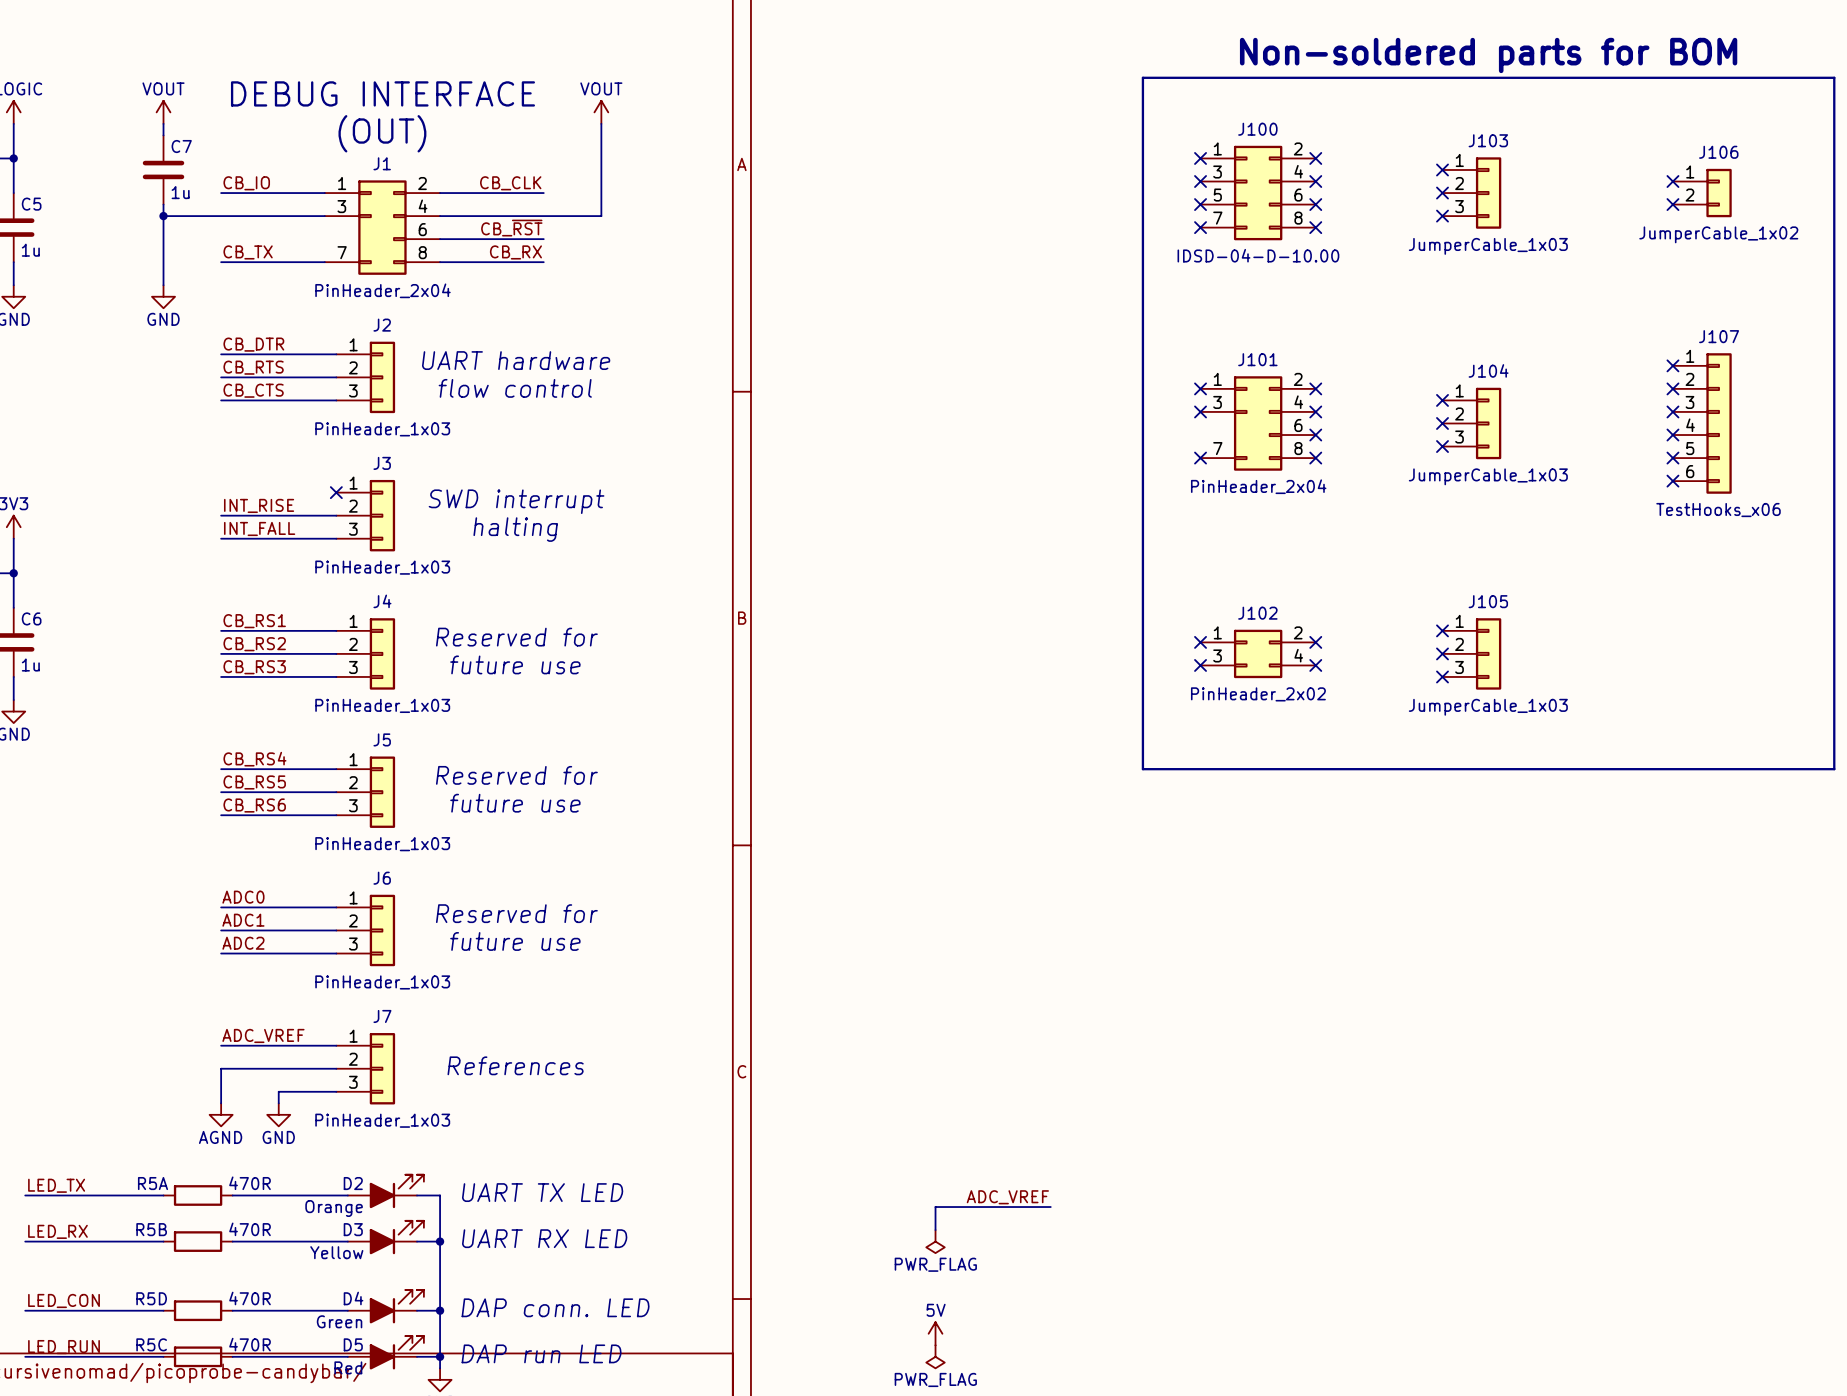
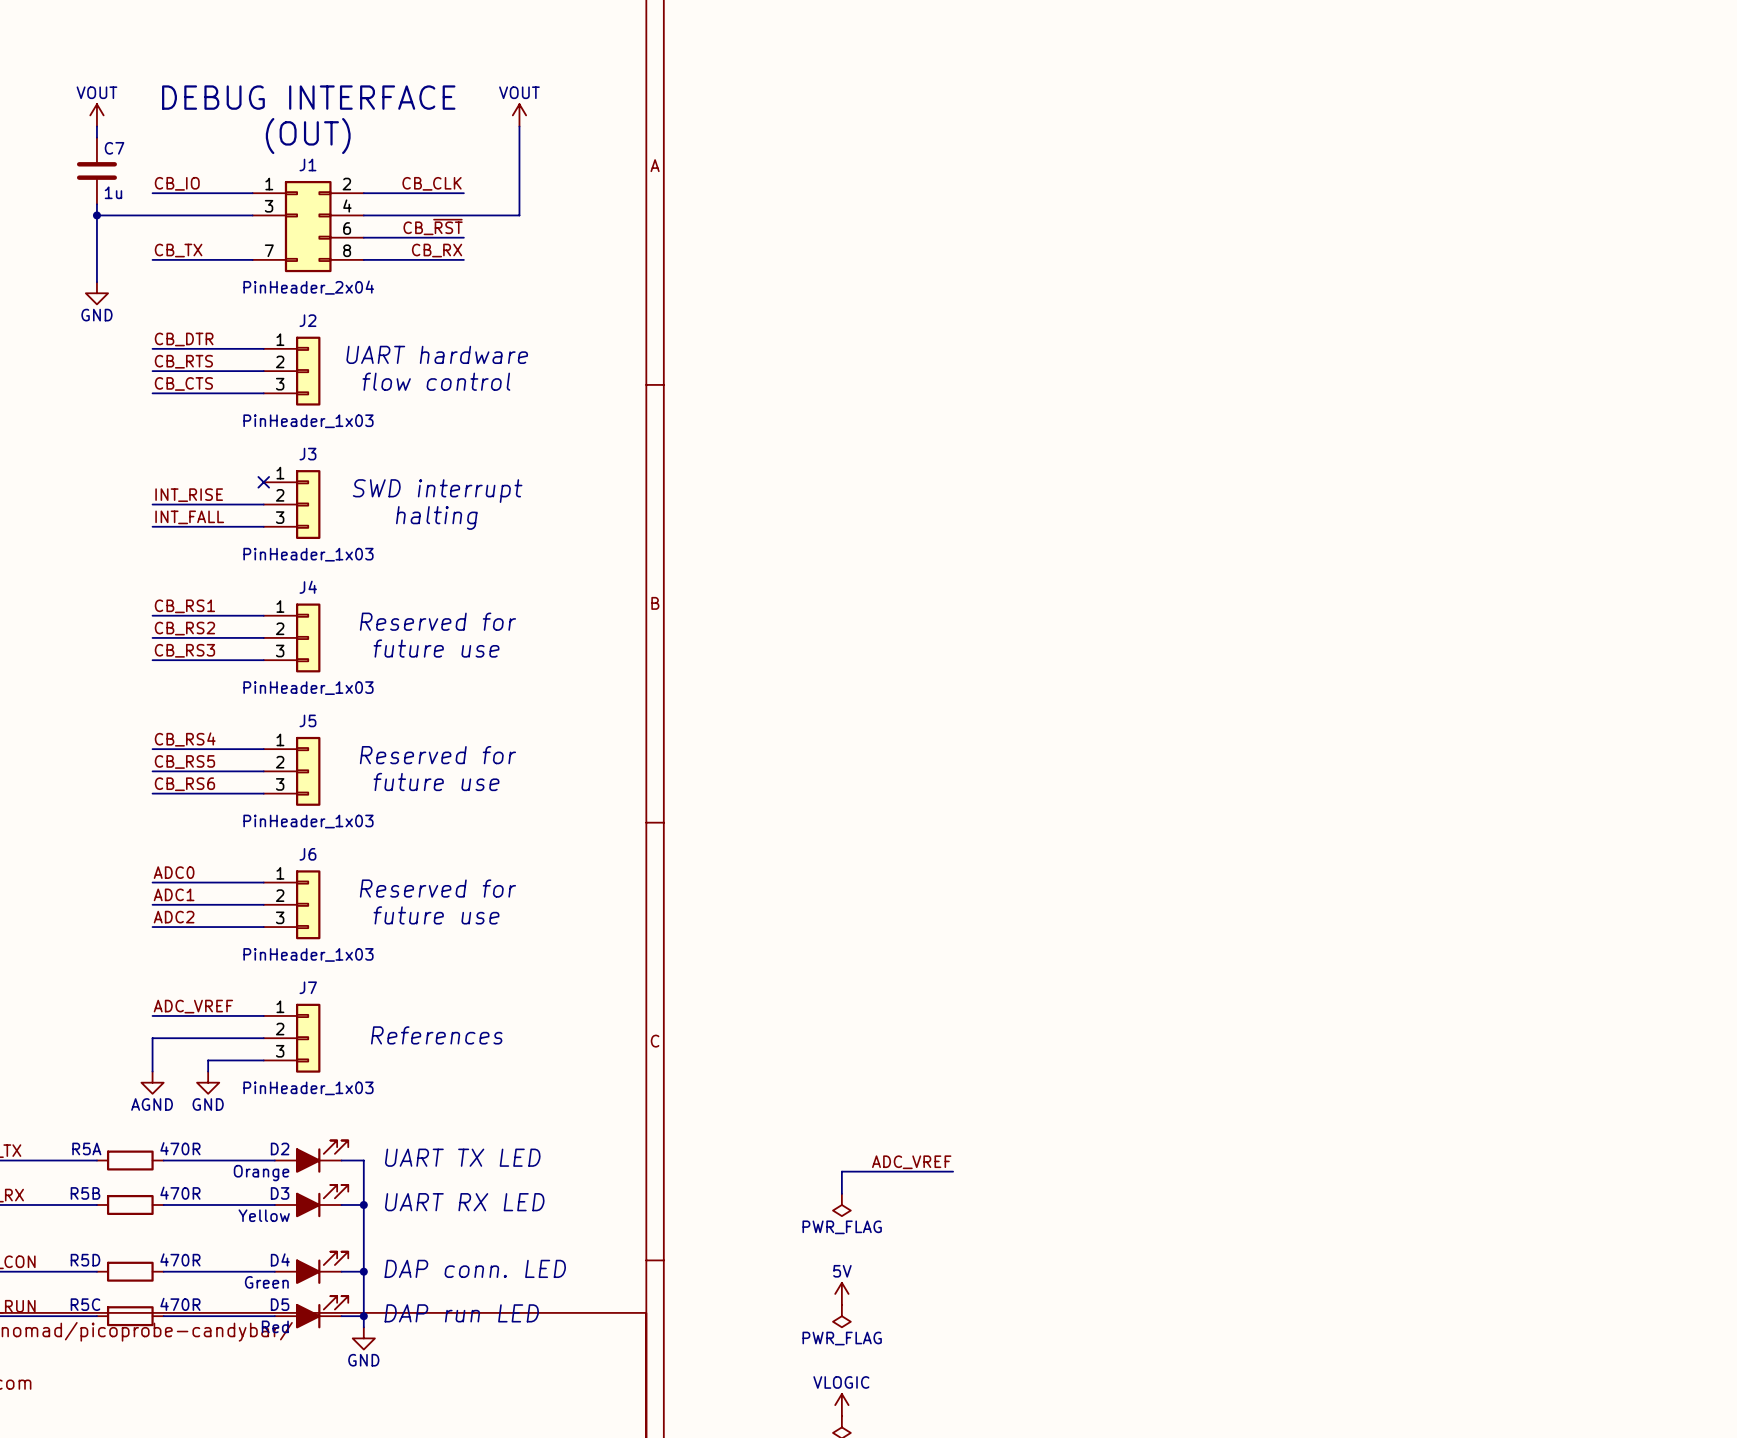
text: Non-soldered parts for BOM (1488, 55) -> none
line: (1142, 77) (1834, 77) (1834, 769) (1142, 769) (1142, 77) -> none
no-connect mark: (1200, 158) -> none
no-connect mark: (1315, 158) -> none
no-connect mark: (1442, 169) -> none
no-connect mark: (1200, 181) -> none
no-connect mark: (1315, 181) -> none
no-connect mark: (1672, 181) -> none
J100: IDSD-04-D-10.00 (1258, 193) -> none
no-connect mark: (1442, 193) -> none
J103: JumperCable_1x03 (1471, 193) -> none
J106: JumperCable_1x02 (1702, 193) -> none
no-connect mark: (1200, 204) -> none
no-connect mark: (1315, 204) -> none
no-connect mark: (1672, 204) -> none
no-connect mark: (1442, 216) -> none
no-connect mark: (1200, 227) -> none
no-connect mark: (1315, 227) -> none
no-connect mark: (1672, 365) -> none
no-connect mark: (1200, 388) -> none
no-connect mark: (1315, 388) -> none
no-connect mark: (1672, 388) -> none
no-connect mark: (1442, 400) -> none
no-connect mark: (1200, 411) -> none
no-connect mark: (1315, 411) -> none
no-connect mark: (1672, 411) -> none
J101: PinHeader_2x04 (1258, 423) -> none
no-connect mark: (1442, 423) -> none
J104: JumperCable_1x03 (1471, 423) -> none
J107: TestHooks_x06 (1702, 423) -> none
no-connect mark: (1315, 435) -> none
no-connect mark: (1672, 435) -> none
no-connect mark: (1442, 446) -> none
no-connect mark: (1200, 458) -> none
no-connect mark: (1315, 458) -> none
no-connect mark: (1672, 458) -> none
no-connect mark: (1672, 481) -> none
no-connect mark: (1442, 630) -> none
no-connect mark: (1200, 642) -> none
no-connect mark: (1315, 642) -> none
J102: PinHeader_2x02 (1258, 653) -> none
no-connect mark: (1442, 653) -> none
J105: JumperCable_1x03 (1471, 653) -> none
no-connect mark: (1200, 665) -> none
no-connect mark: (1315, 665) -> none
no-connect mark: (1442, 676) -> none

